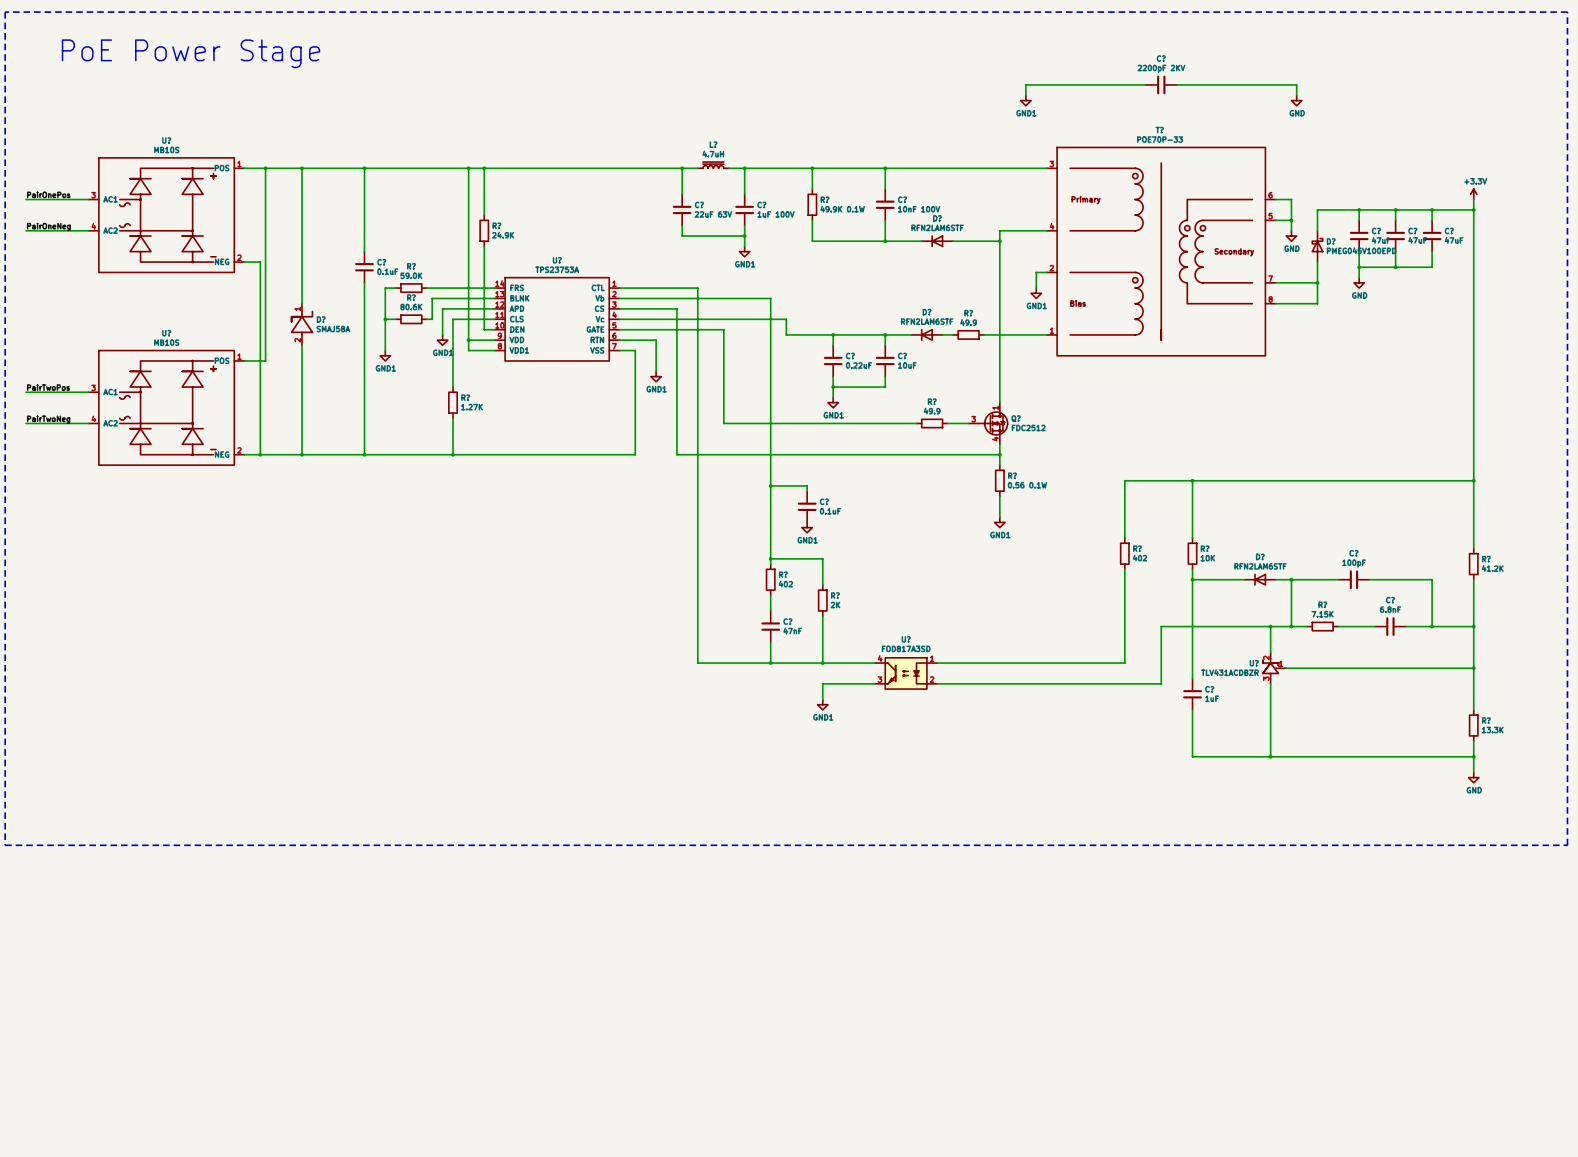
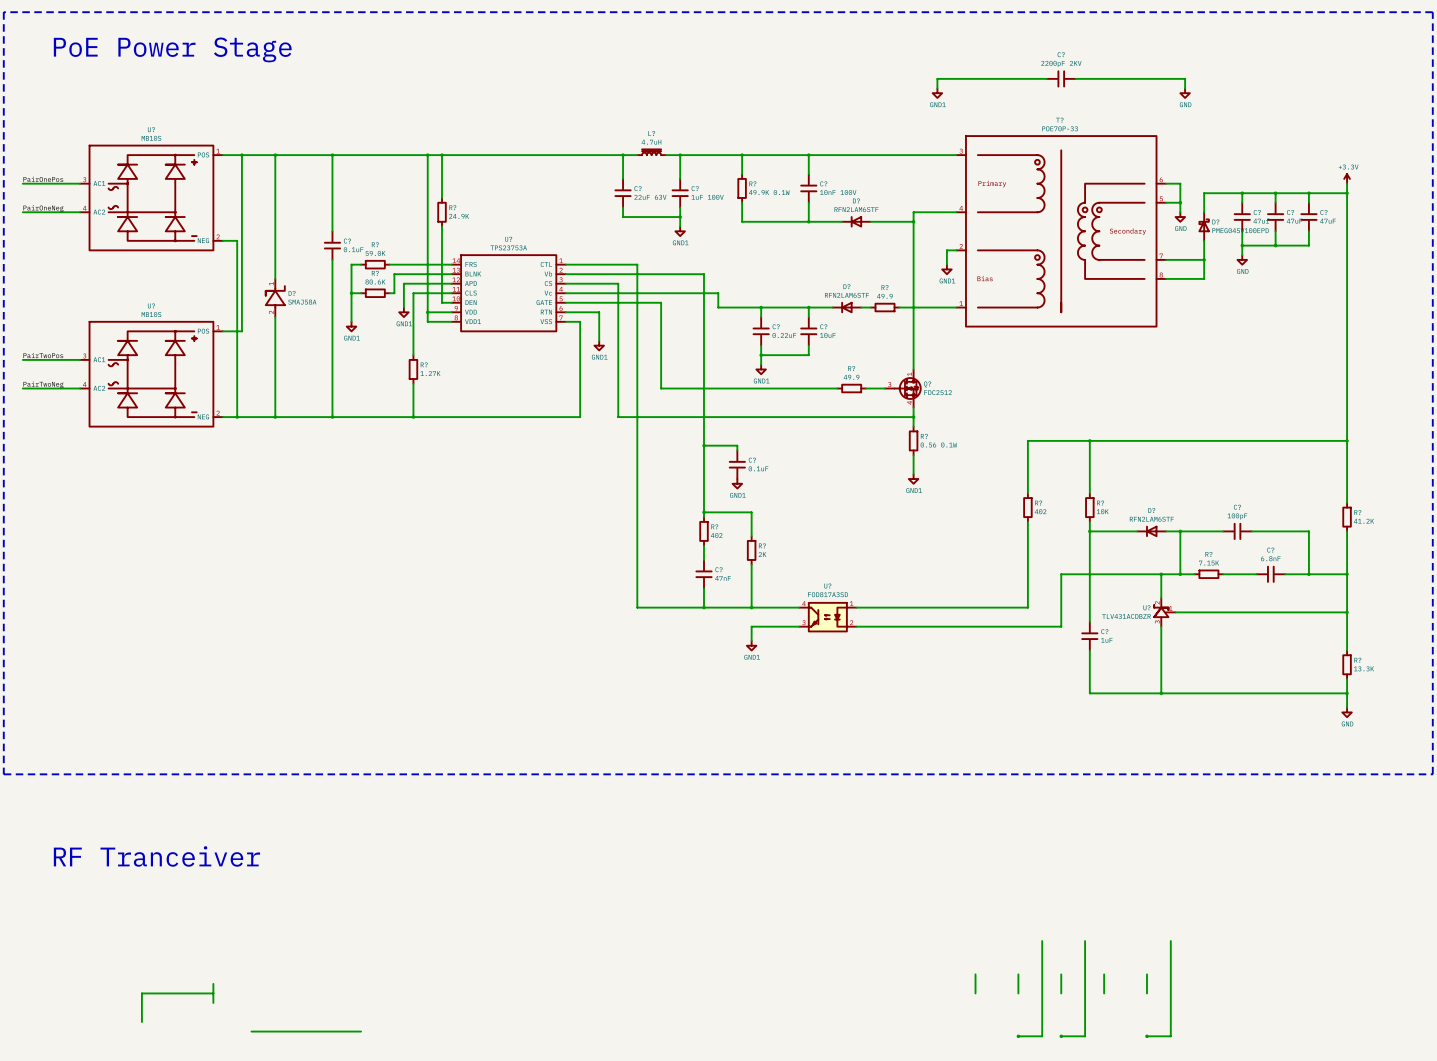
text: none -> RF Tranceiver (156, 856)
wire: none -> (1042, 941) (1042, 1036) (1018, 1036)
wire: none -> (1085, 941) (1085, 1036) (1061, 1036)
wire: none -> (1170, 941) (1170, 1036) (1146, 1036)
wire: none -> (975, 974) (975, 993)
wire: none -> (1018, 974) (1018, 993)
wire: none -> (1061, 974) (1061, 993)
wire: none -> (1104, 974) (1104, 993)
wire: none -> (1146, 974) (1146, 993)
wire: none -> (213, 983) (213, 1002)
wire: none -> (213, 993) (141, 993) (141, 1022)
wire: none -> (251, 1031) (361, 1031)
junction: none -> (1018, 1036)
junction: none -> (1061, 1036)
junction: none -> (1146, 1036)

